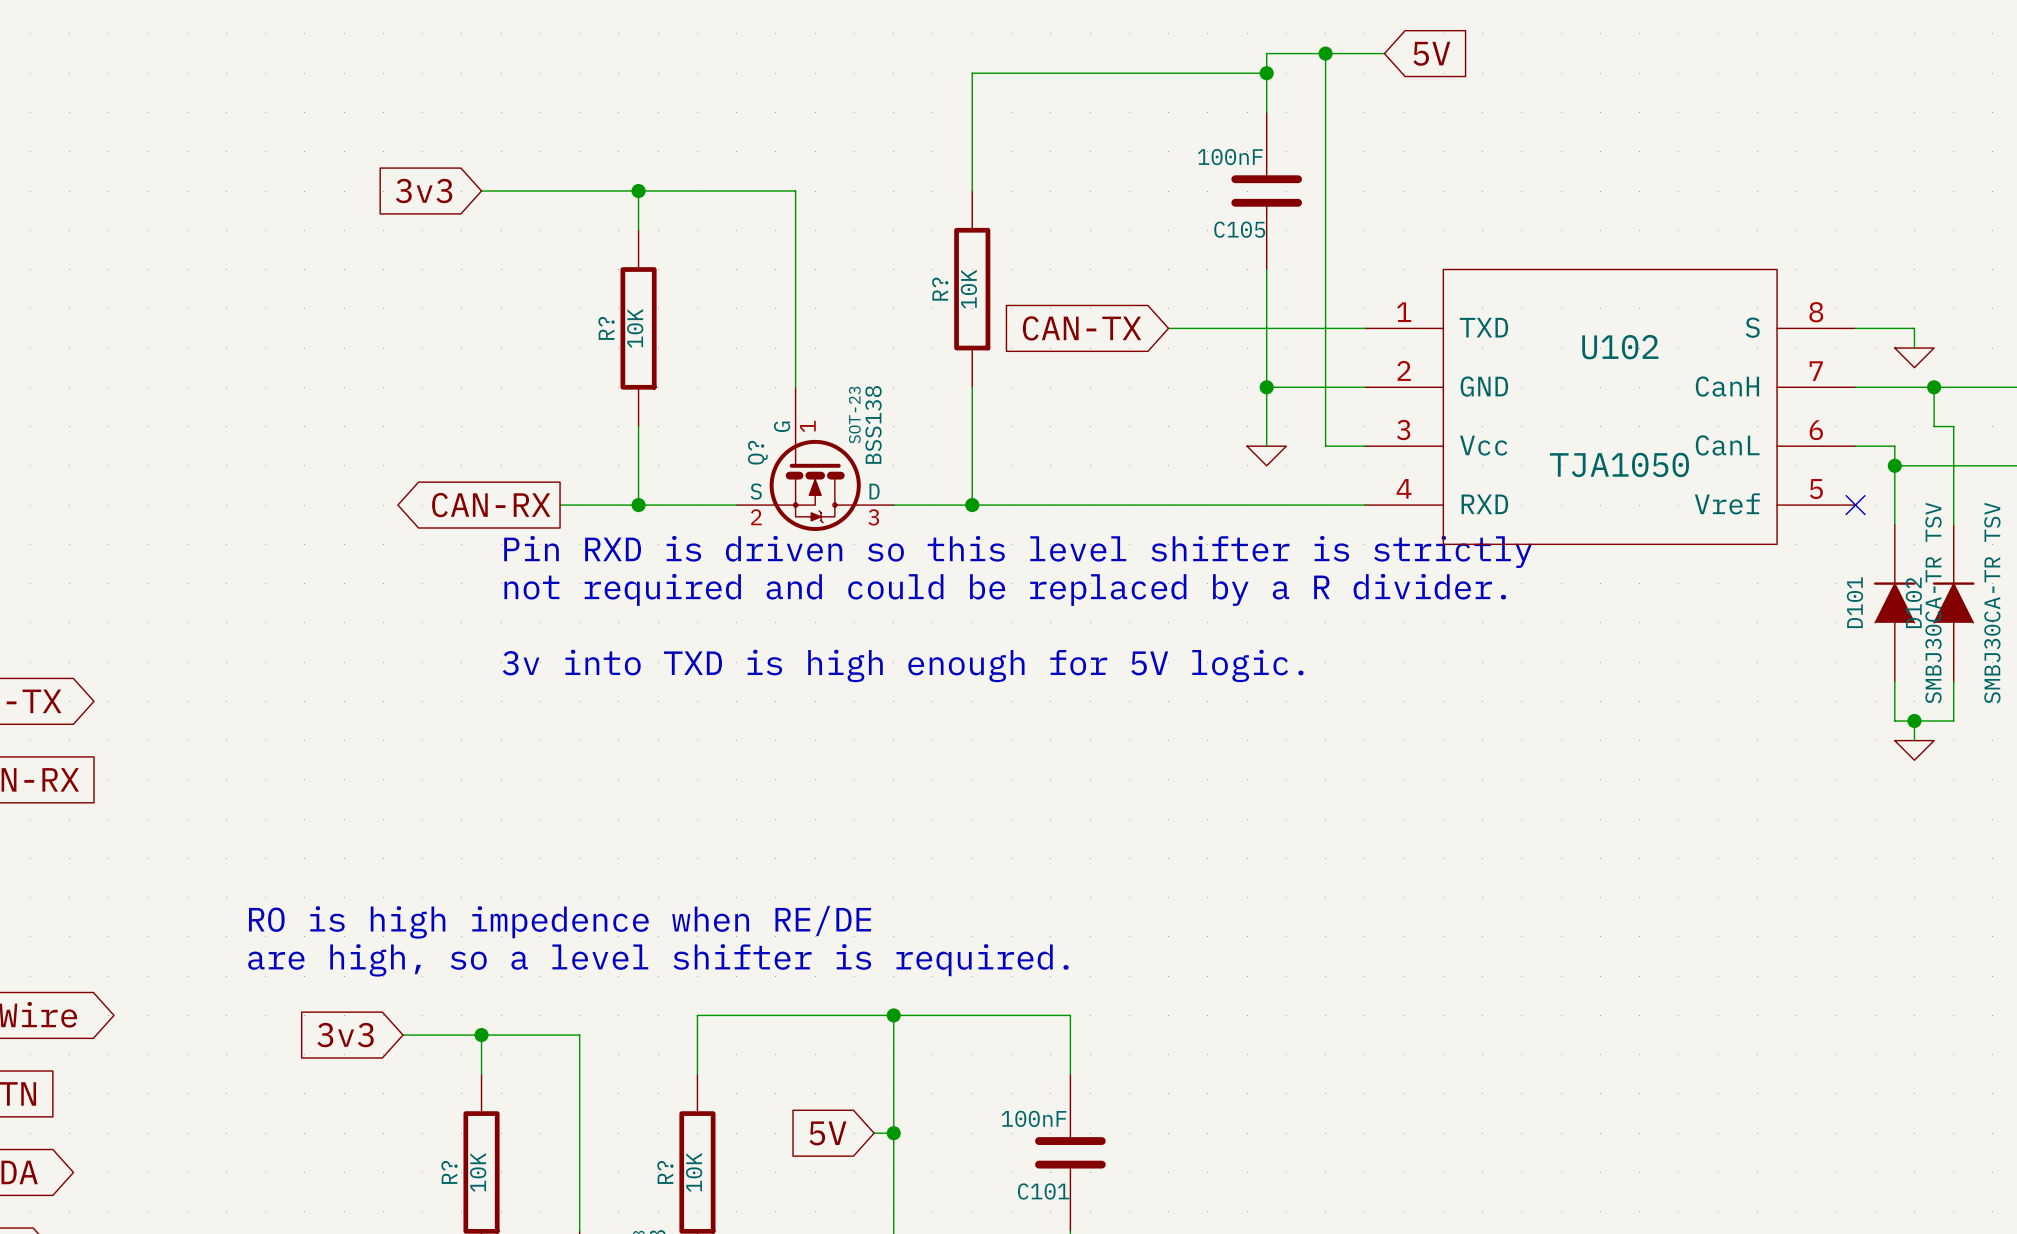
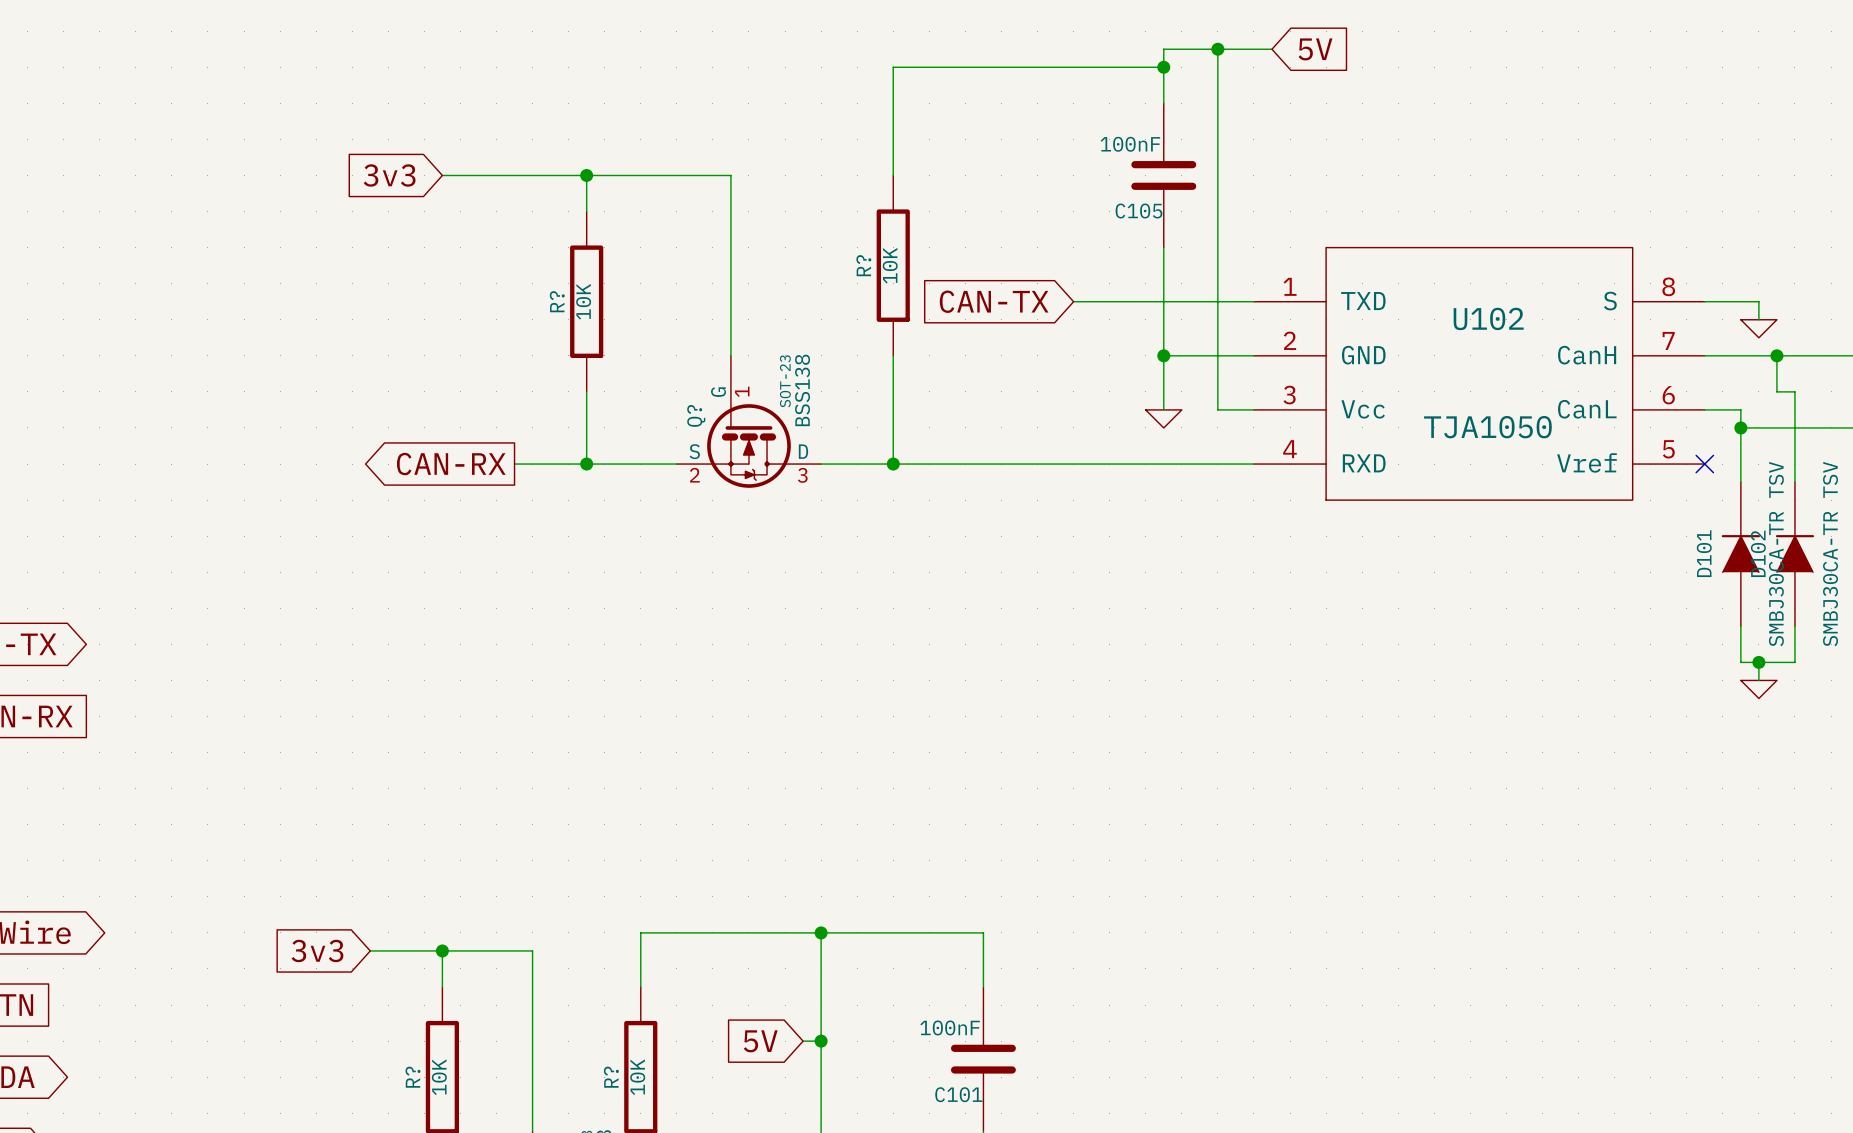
text: Pin RXD is driven so this level shifter is strictly (1018, 551) -> none
text: not required and could be replaced by a R divider. (1005, 589) -> none
text: 3v into TXD is high enough for 5V logic. (903, 665) -> none
text: RO is high impedence when RE/DE (559, 922) -> none
text: are high, so a level shifter is required. (658, 960) -> none

